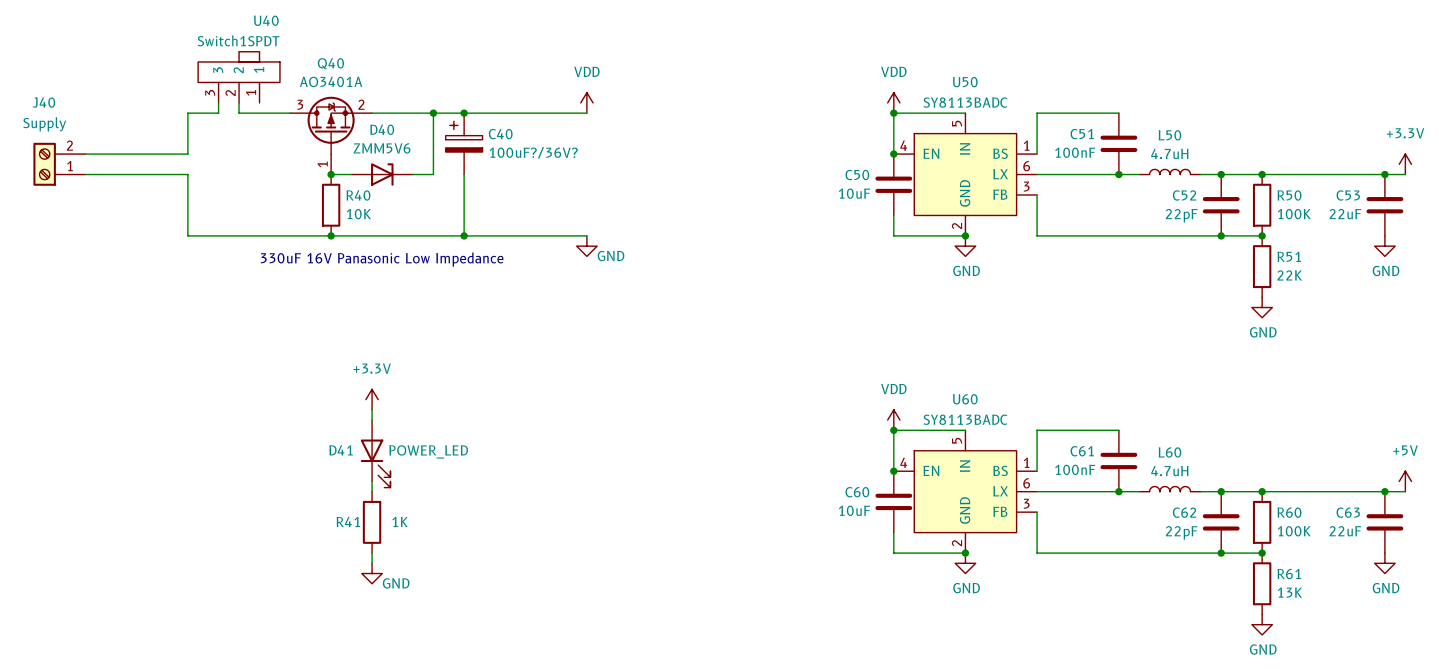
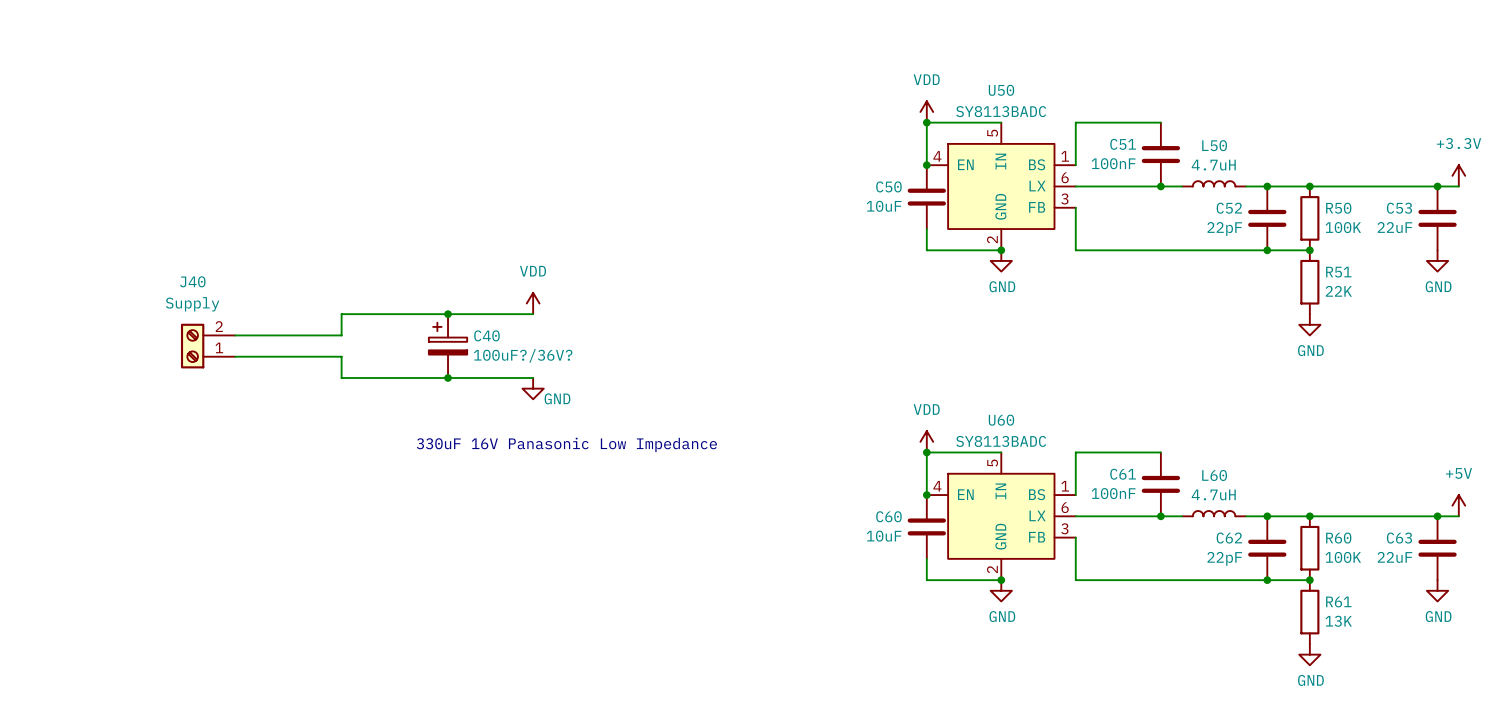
U40: Switch1SPDT (239, 77) -> none
wire: (218, 102) (218, 113) (187, 113) (187, 154) (85, 154) -> none
wire: (239, 102) (239, 113) (290, 113) -> none
power symbol position: VDD (586, 102) -> VDD (533, 303)
wire: (372, 113) (586, 113) -> none
wire: (433, 113) (433, 174) (412, 174) -> none
junction: (433, 113) -> none
junction: (464, 113) -> none
Q40: AO3401A (331, 135) -> none
C40 position: (464, 143) -> (448, 346)
J40 position: (59, 164) -> (208, 346)
wire: (85, 174) (187, 174) (187, 235) (586, 235) -> none
wire: (331, 174) (351, 174) -> none
junction: (331, 174) -> none
D40: ZMM5V6 (382, 174) -> none
wire: (464, 174) (464, 235) -> none
R40: 10K (331, 205) -> none
junction: (331, 235) -> none
junction: (464, 235) -> none
power symbol: GND (586, 246) -> none
text: 330uF 16V Panasonic Low Impedance (382, 259) -> none
junction: none -> (448, 314)
wire: none -> (533, 314) (341, 314) (341, 335) (235, 335)
wire: none -> (235, 356) (341, 356) (341, 377) (533, 377)
junction: none -> (448, 377)
power symbol: none -> GND (533, 388)
power symbol: +3.3V (372, 399) -> none
wire: (372, 409) (372, 420) -> none
text: none -> 330uF 16V Panasonic Low Impedance (566, 444)
D41: POWER_LED (375, 453) -> none
wire: (372, 481) (372, 491) -> none
R41: 1K (372, 522) -> none
wire: (372, 553) (372, 563) -> none
power symbol: GND (372, 573) -> none

